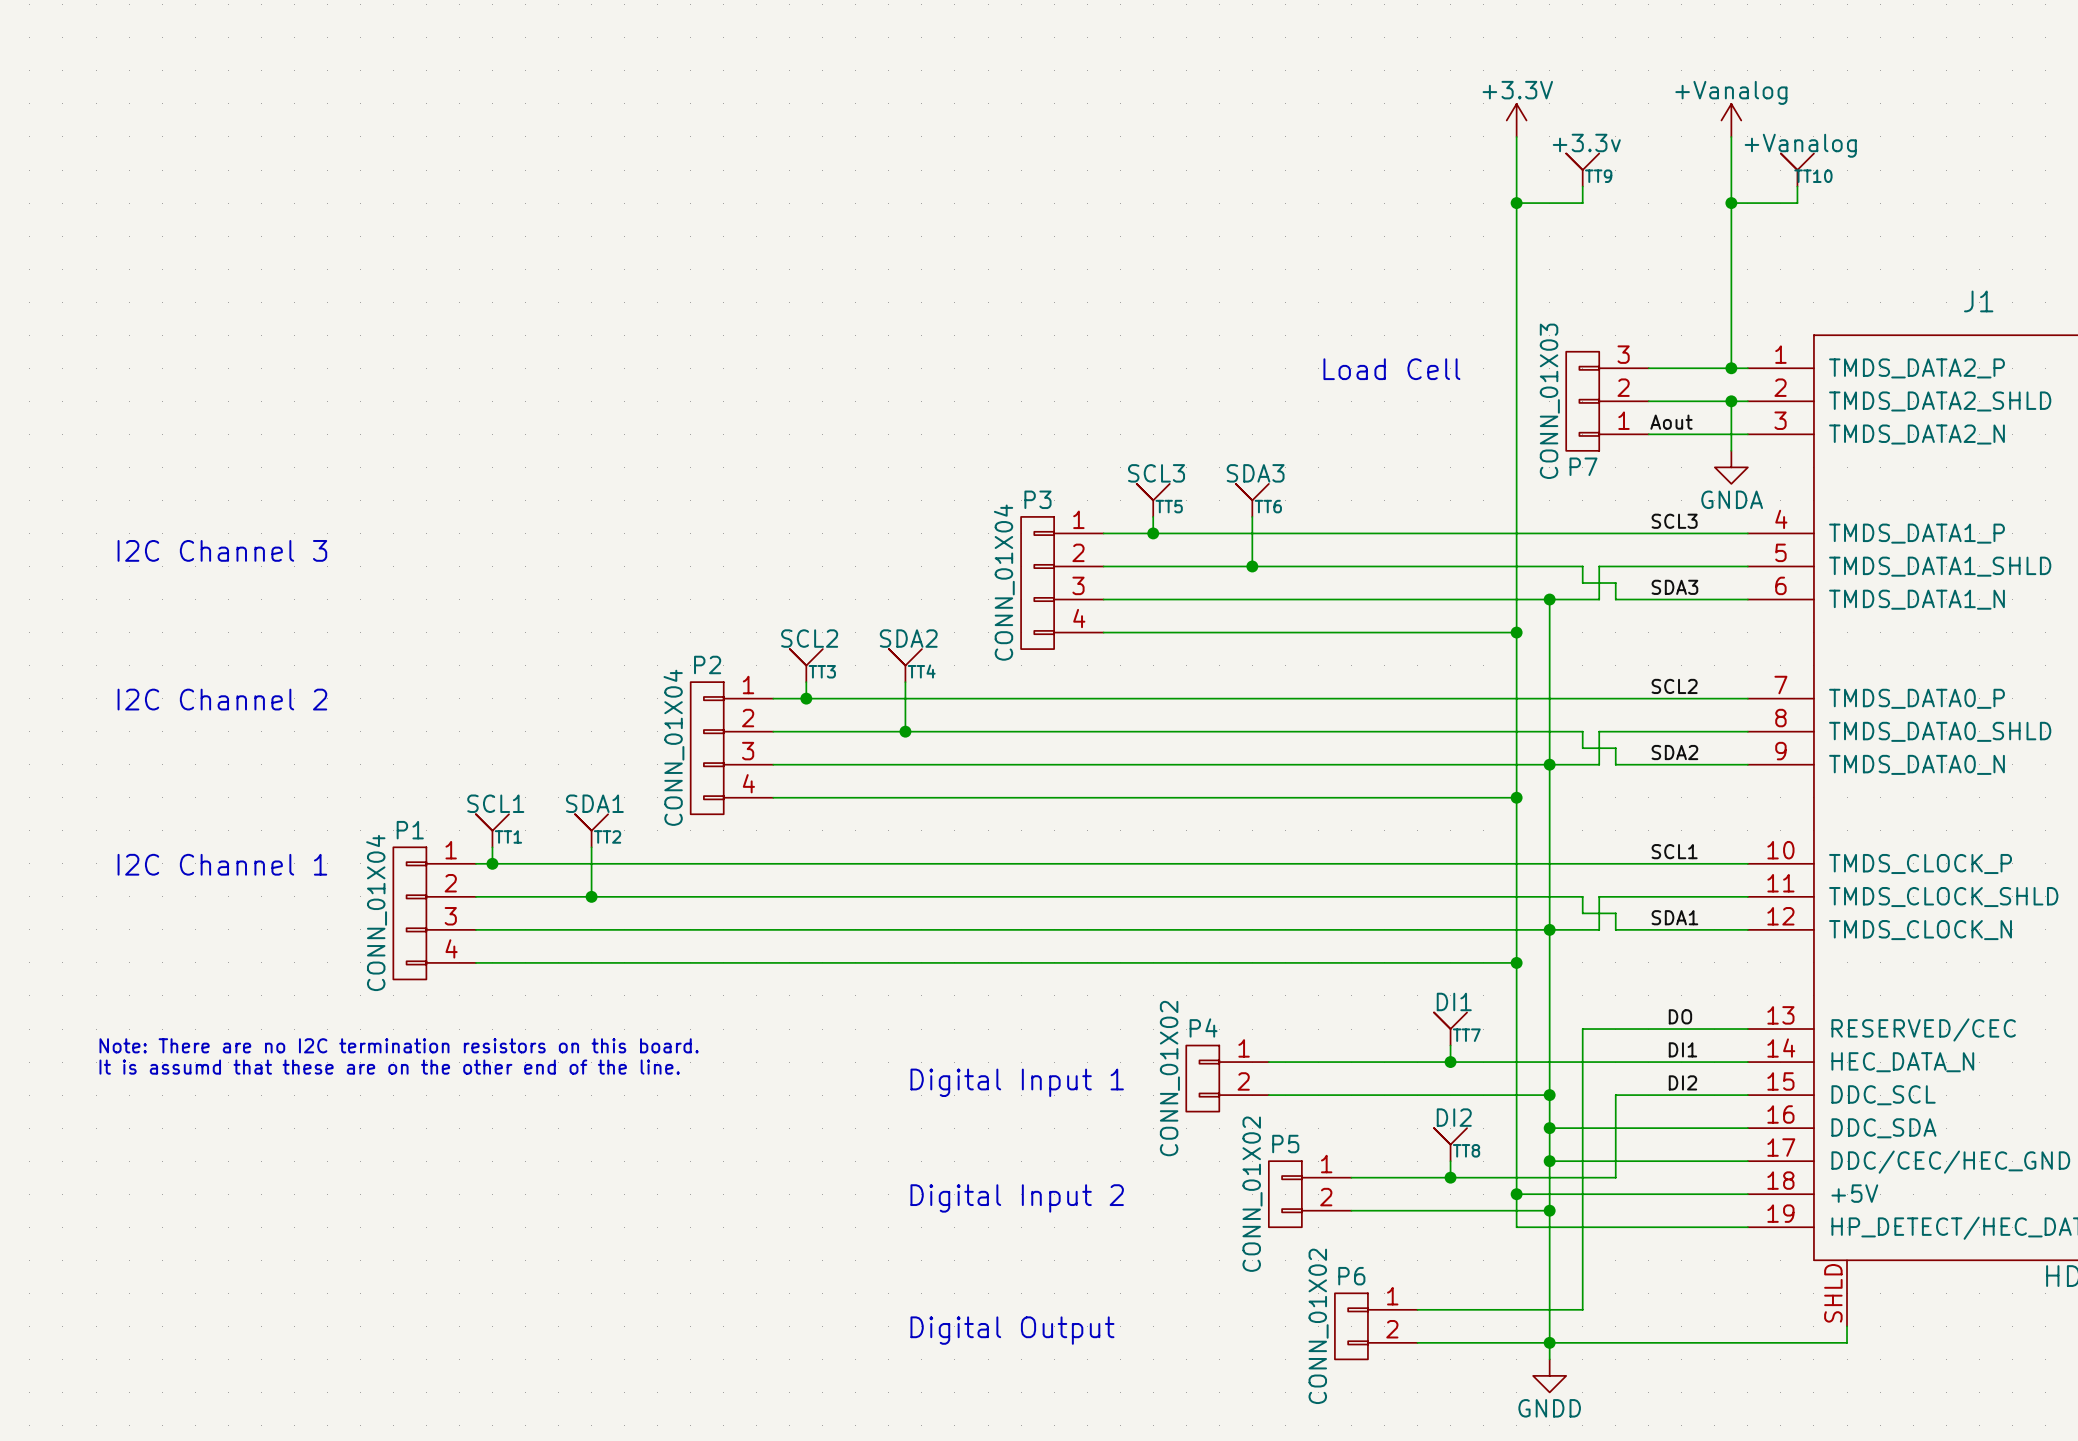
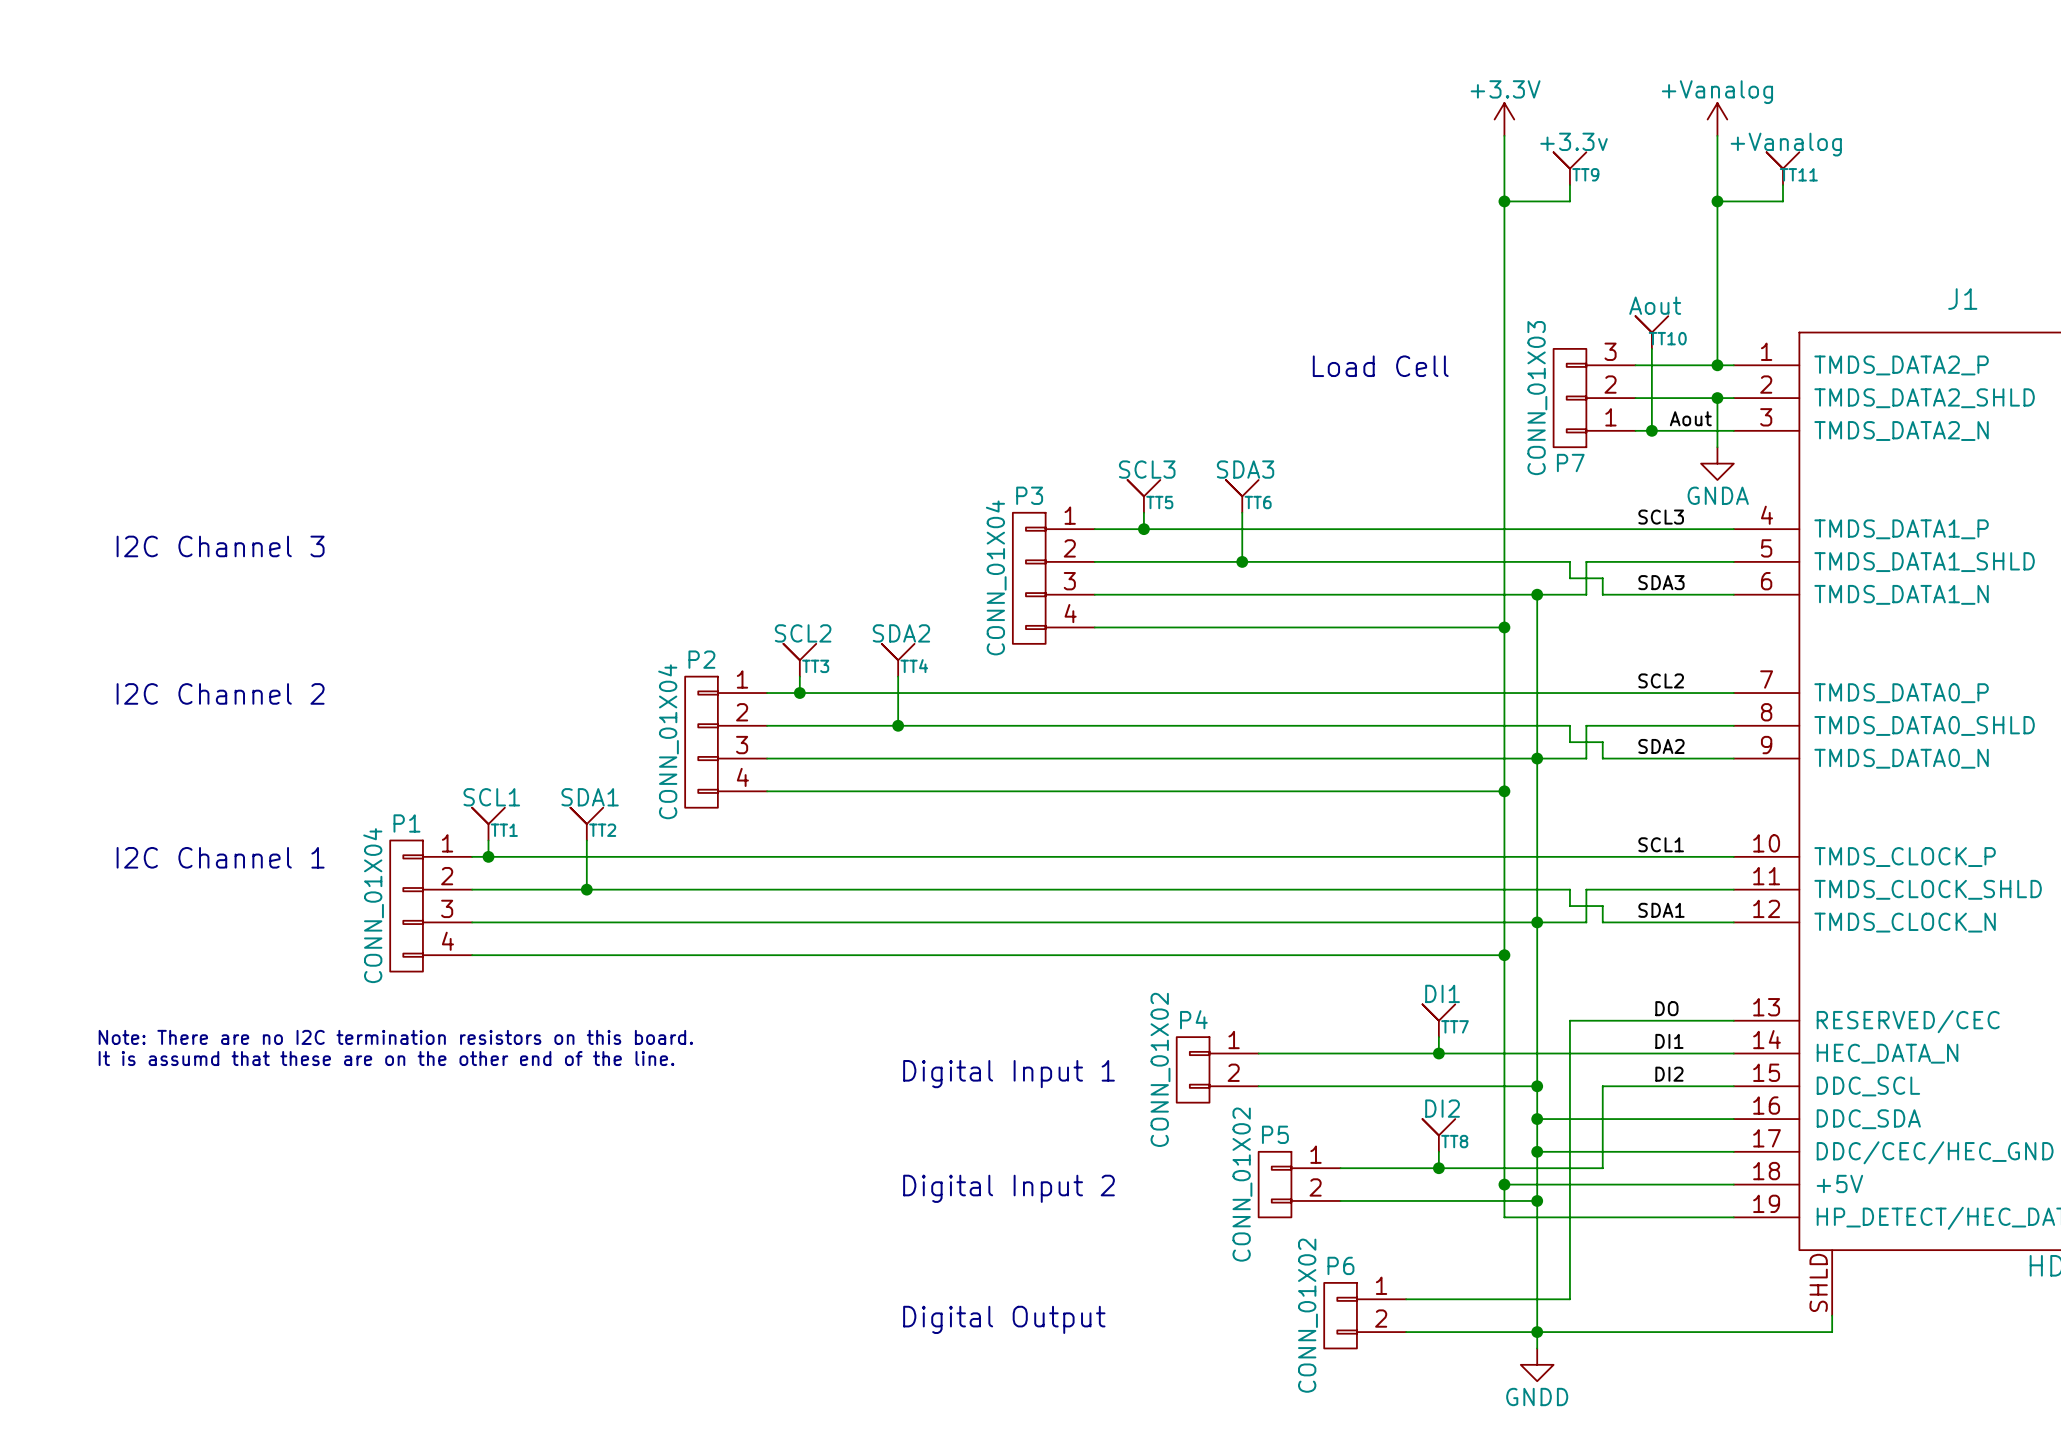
TT10 name: TT10 (1813, 176) -> TT11 (1798, 174)
TT10: none -> Aout (1651, 332)
wire: none -> (1651, 348) (1651, 430)
label position: Aout (1671, 422) -> Aout (1690, 418)
junction: none -> (1651, 430)

